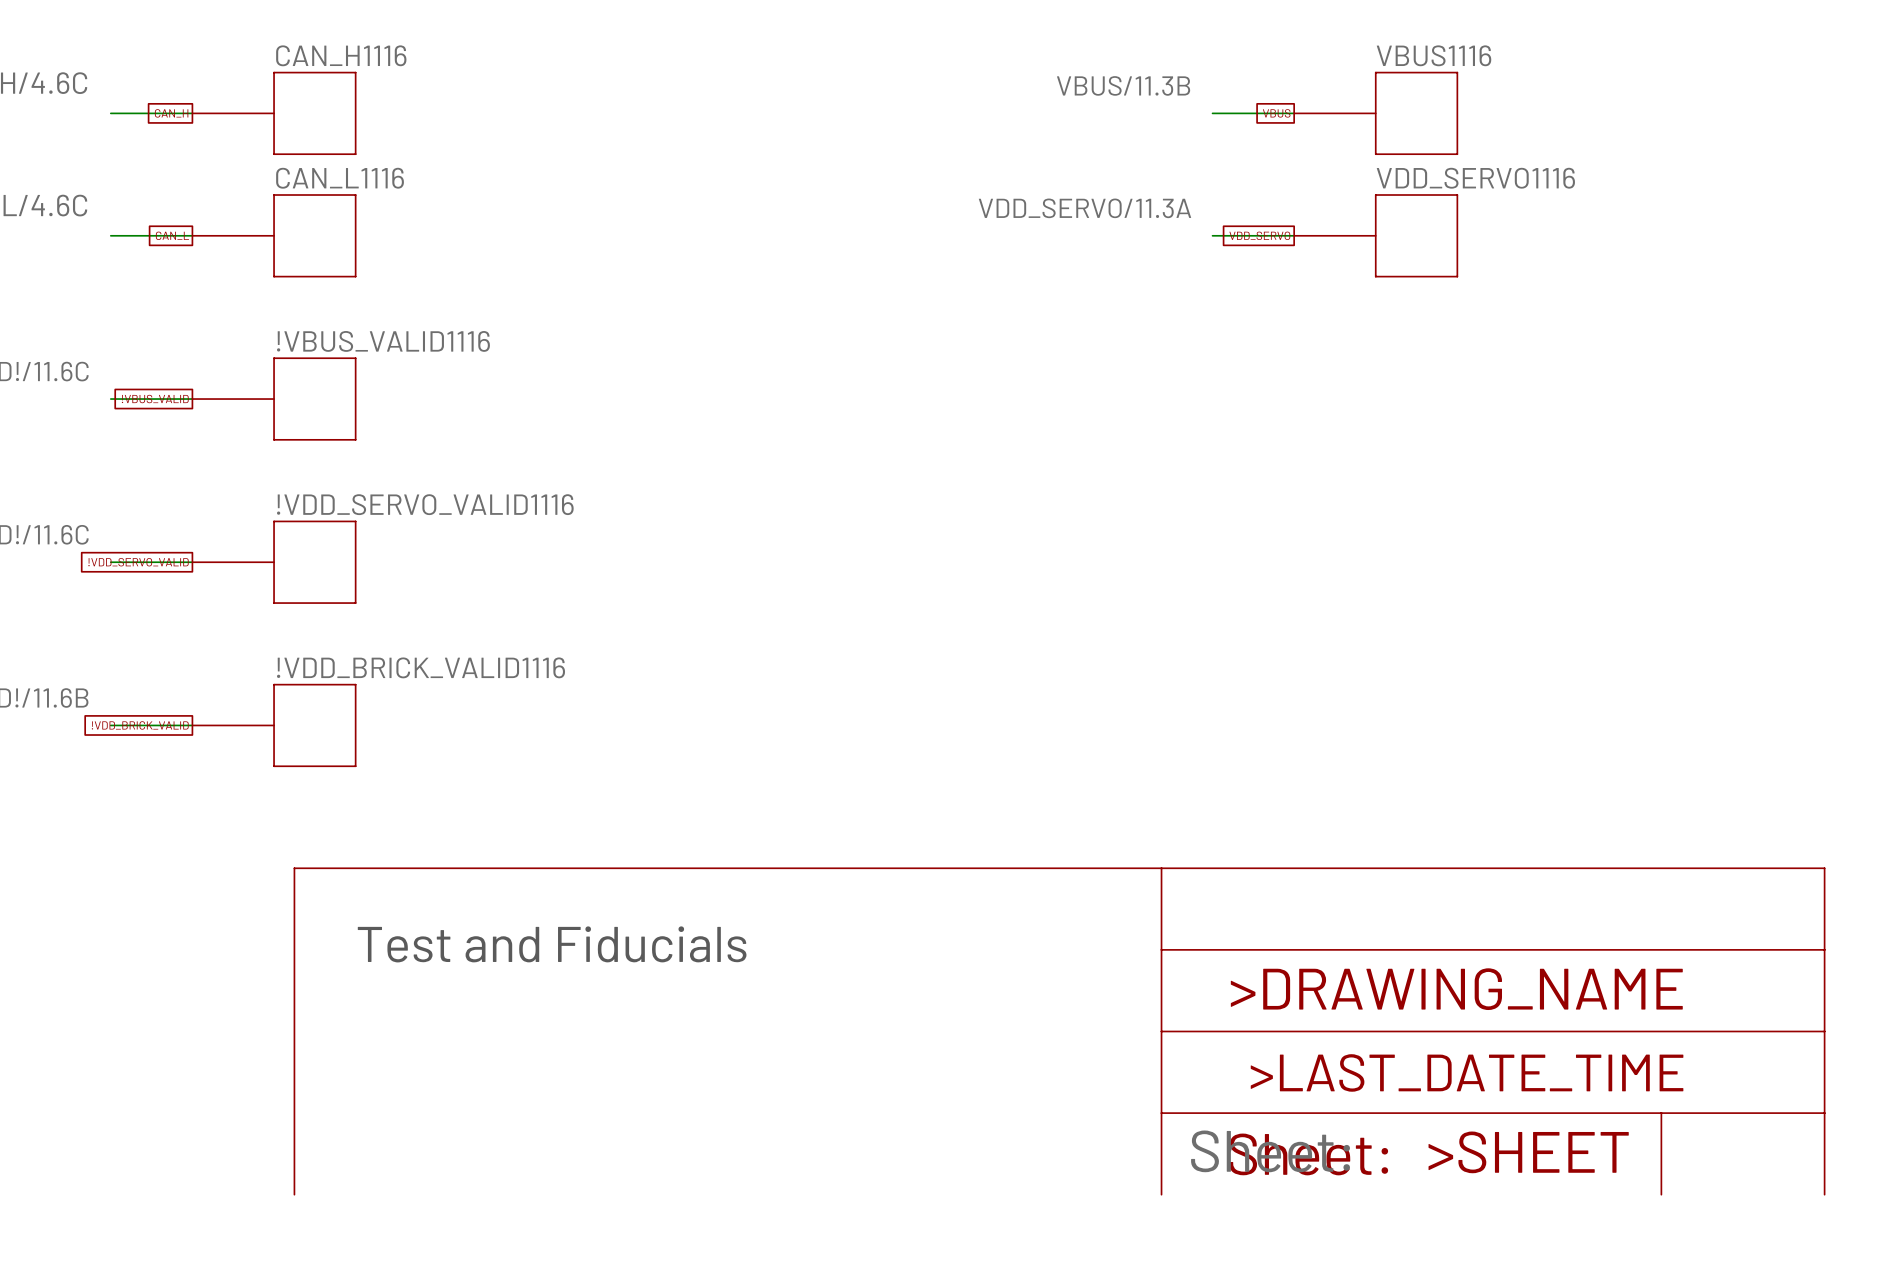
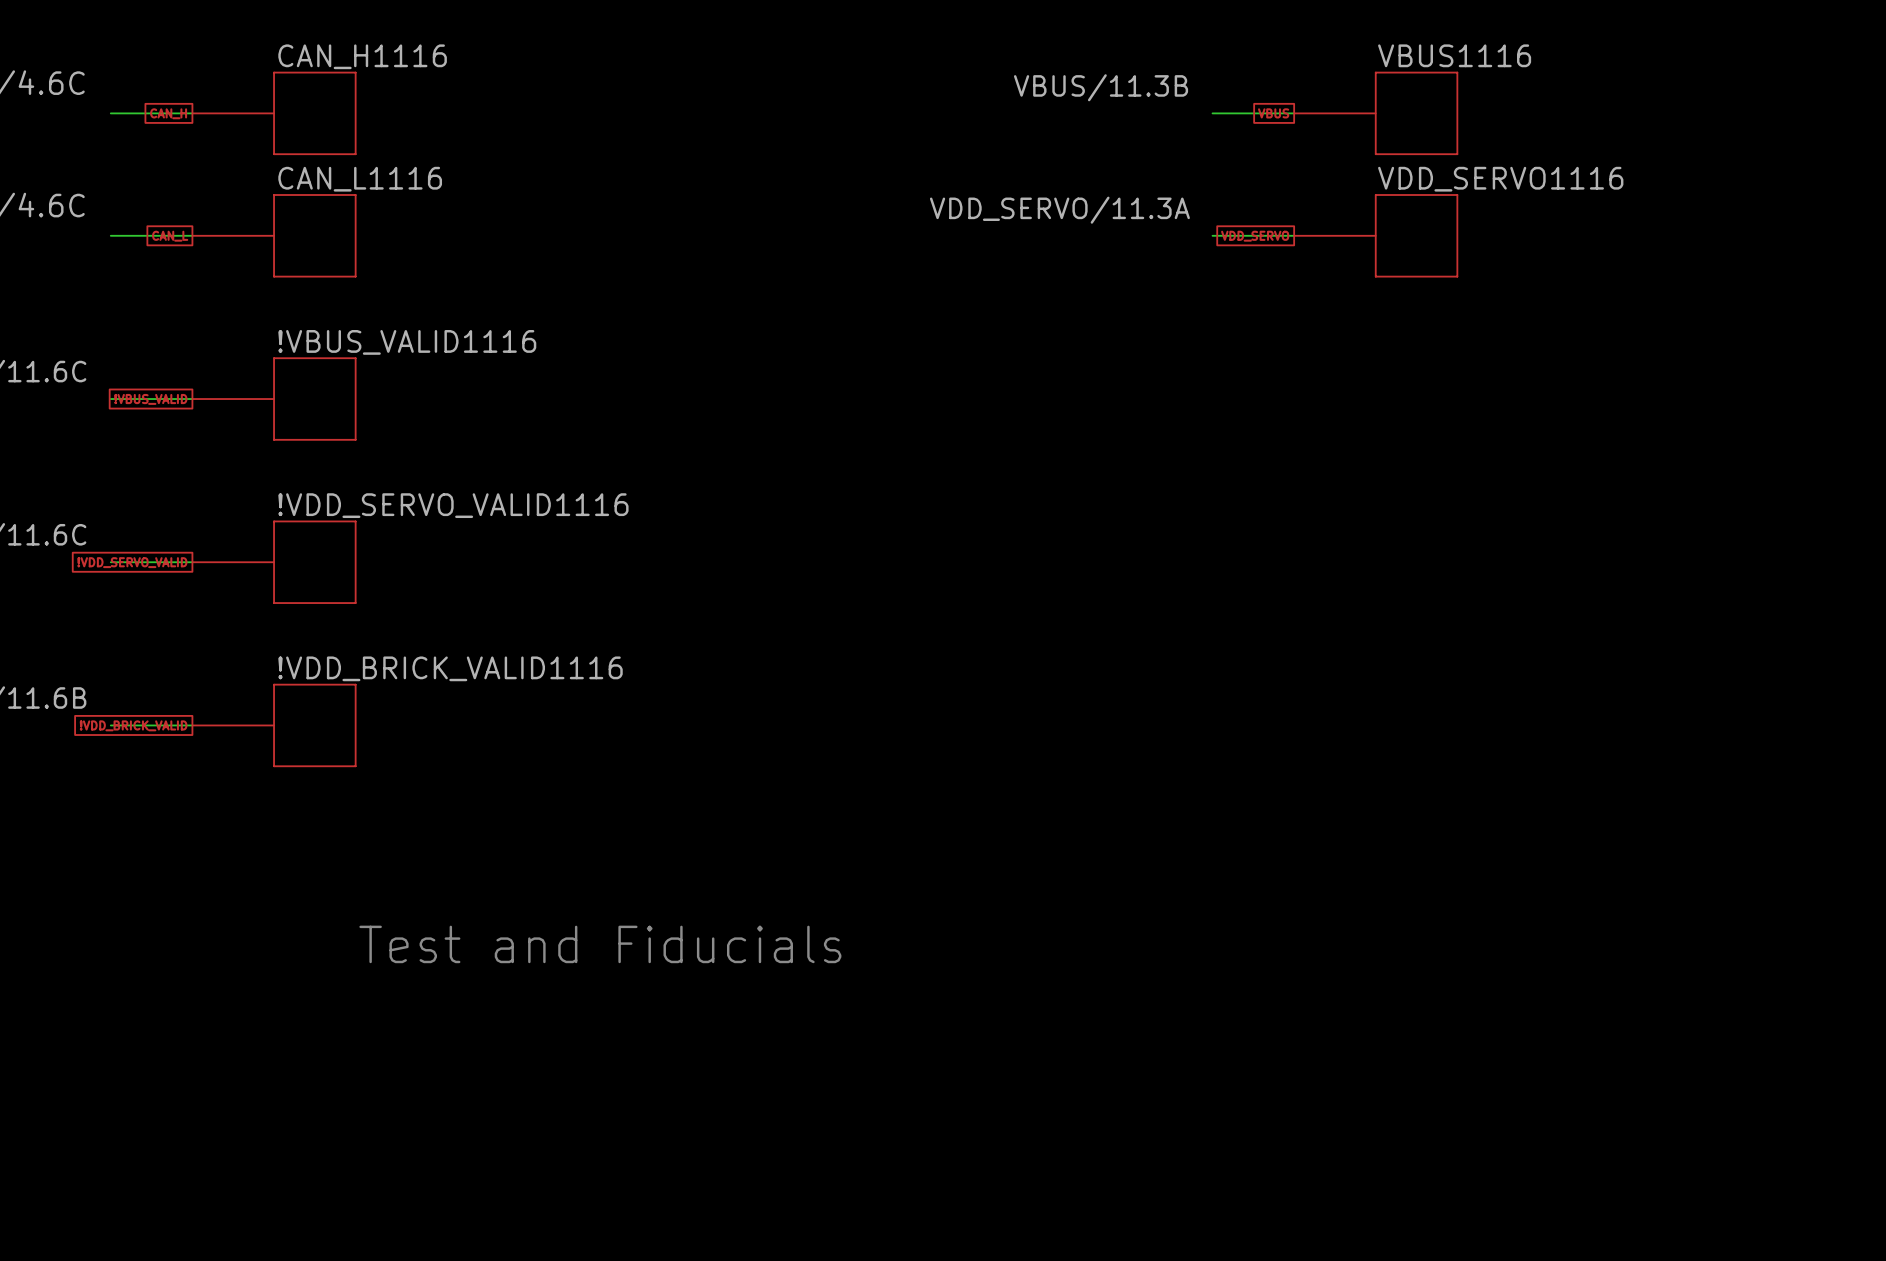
power symbol: Sheet: (1059, 1031) -> none

